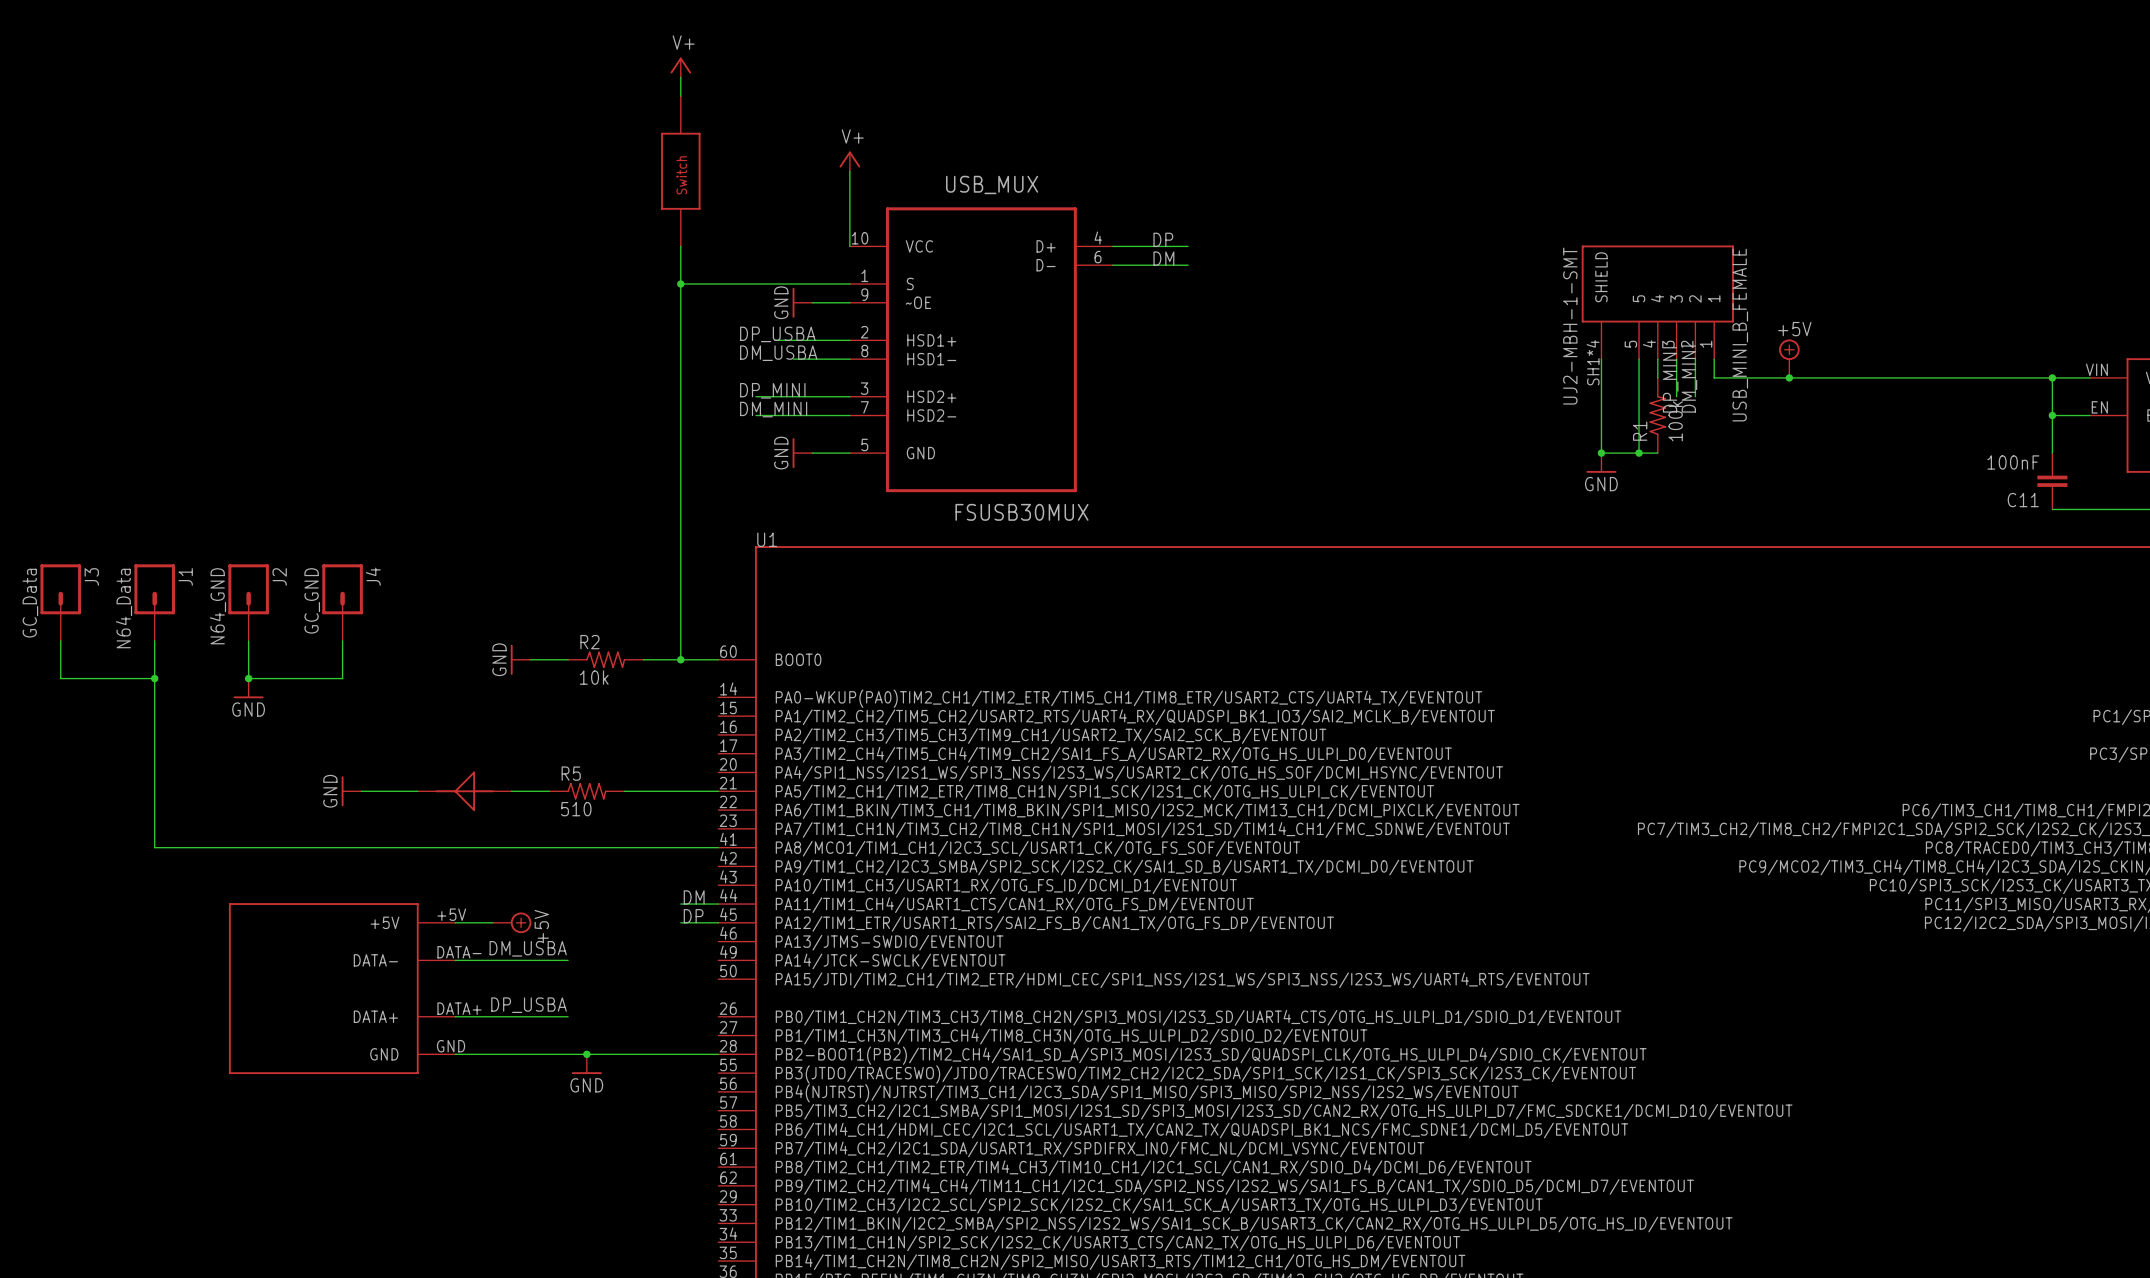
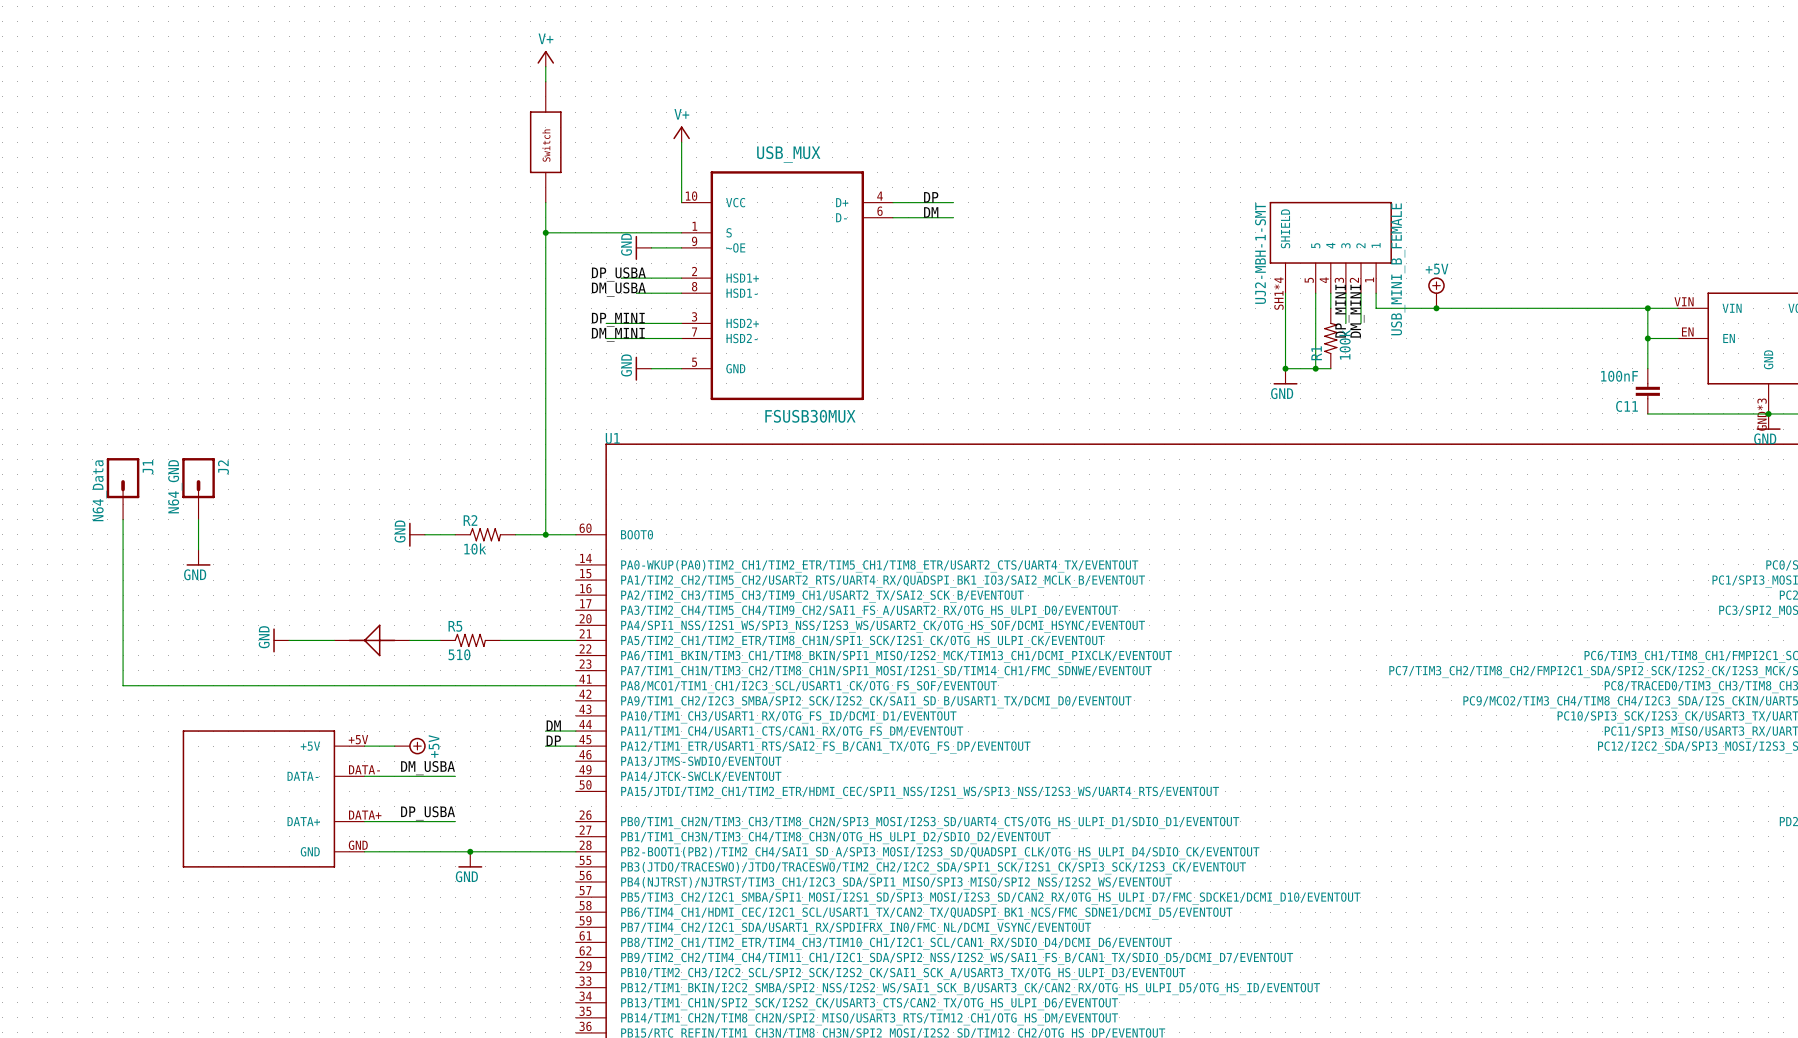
J3: GC_Data (60, 602) -> none
J4: GC_GND (342, 602) -> none
wire: (60, 640) (60, 678) (154, 678) -> none
wire: (342, 640) (342, 678) (248, 678) -> none
junction: (154, 678) -> none
junction: (248, 678) -> none

